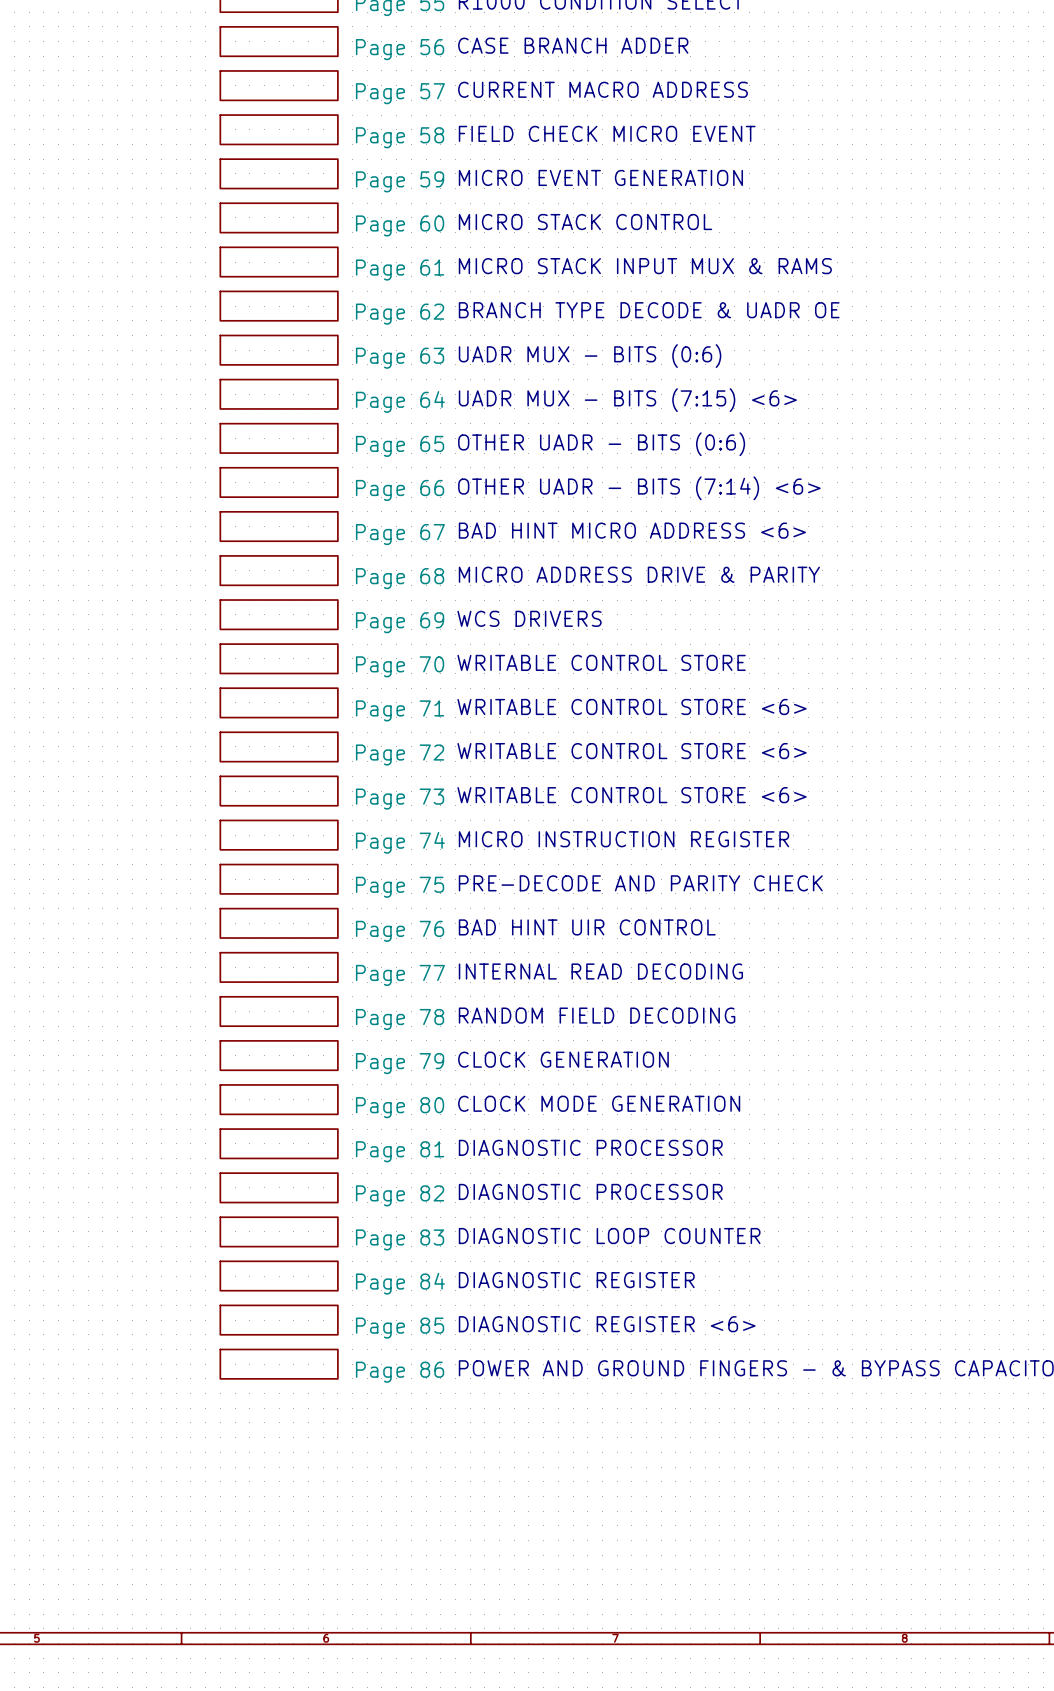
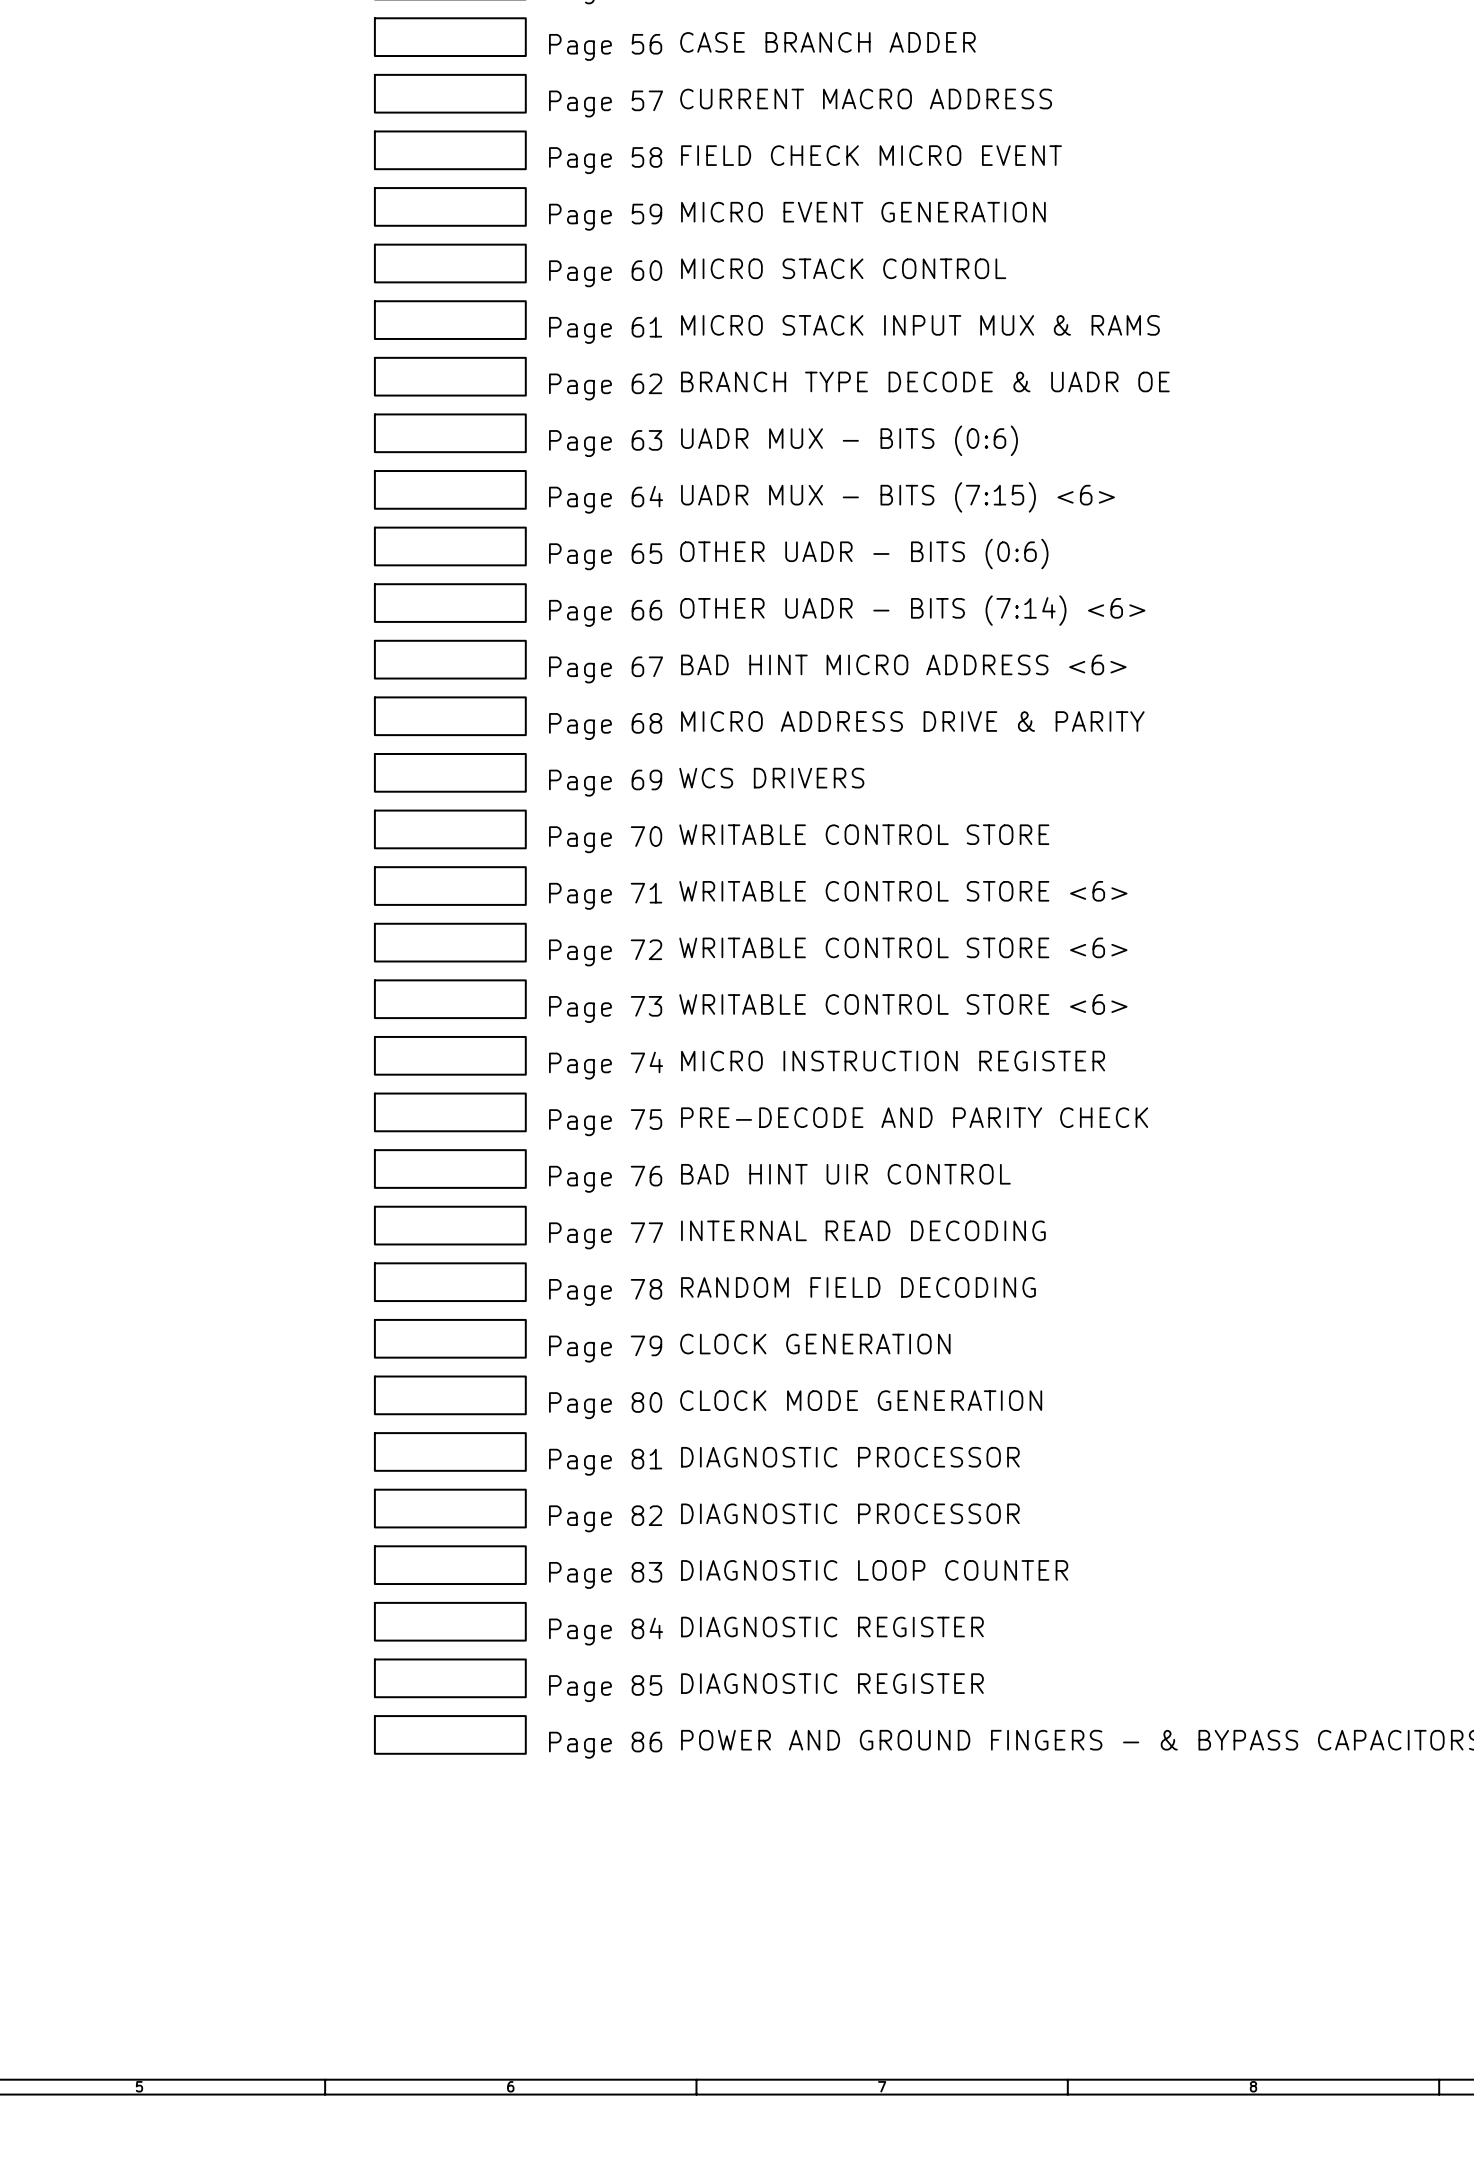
text: DIAGNOSTIC REGISTER <6> (607, 1324) -> DIAGNOSTIC REGISTER (832, 1683)

